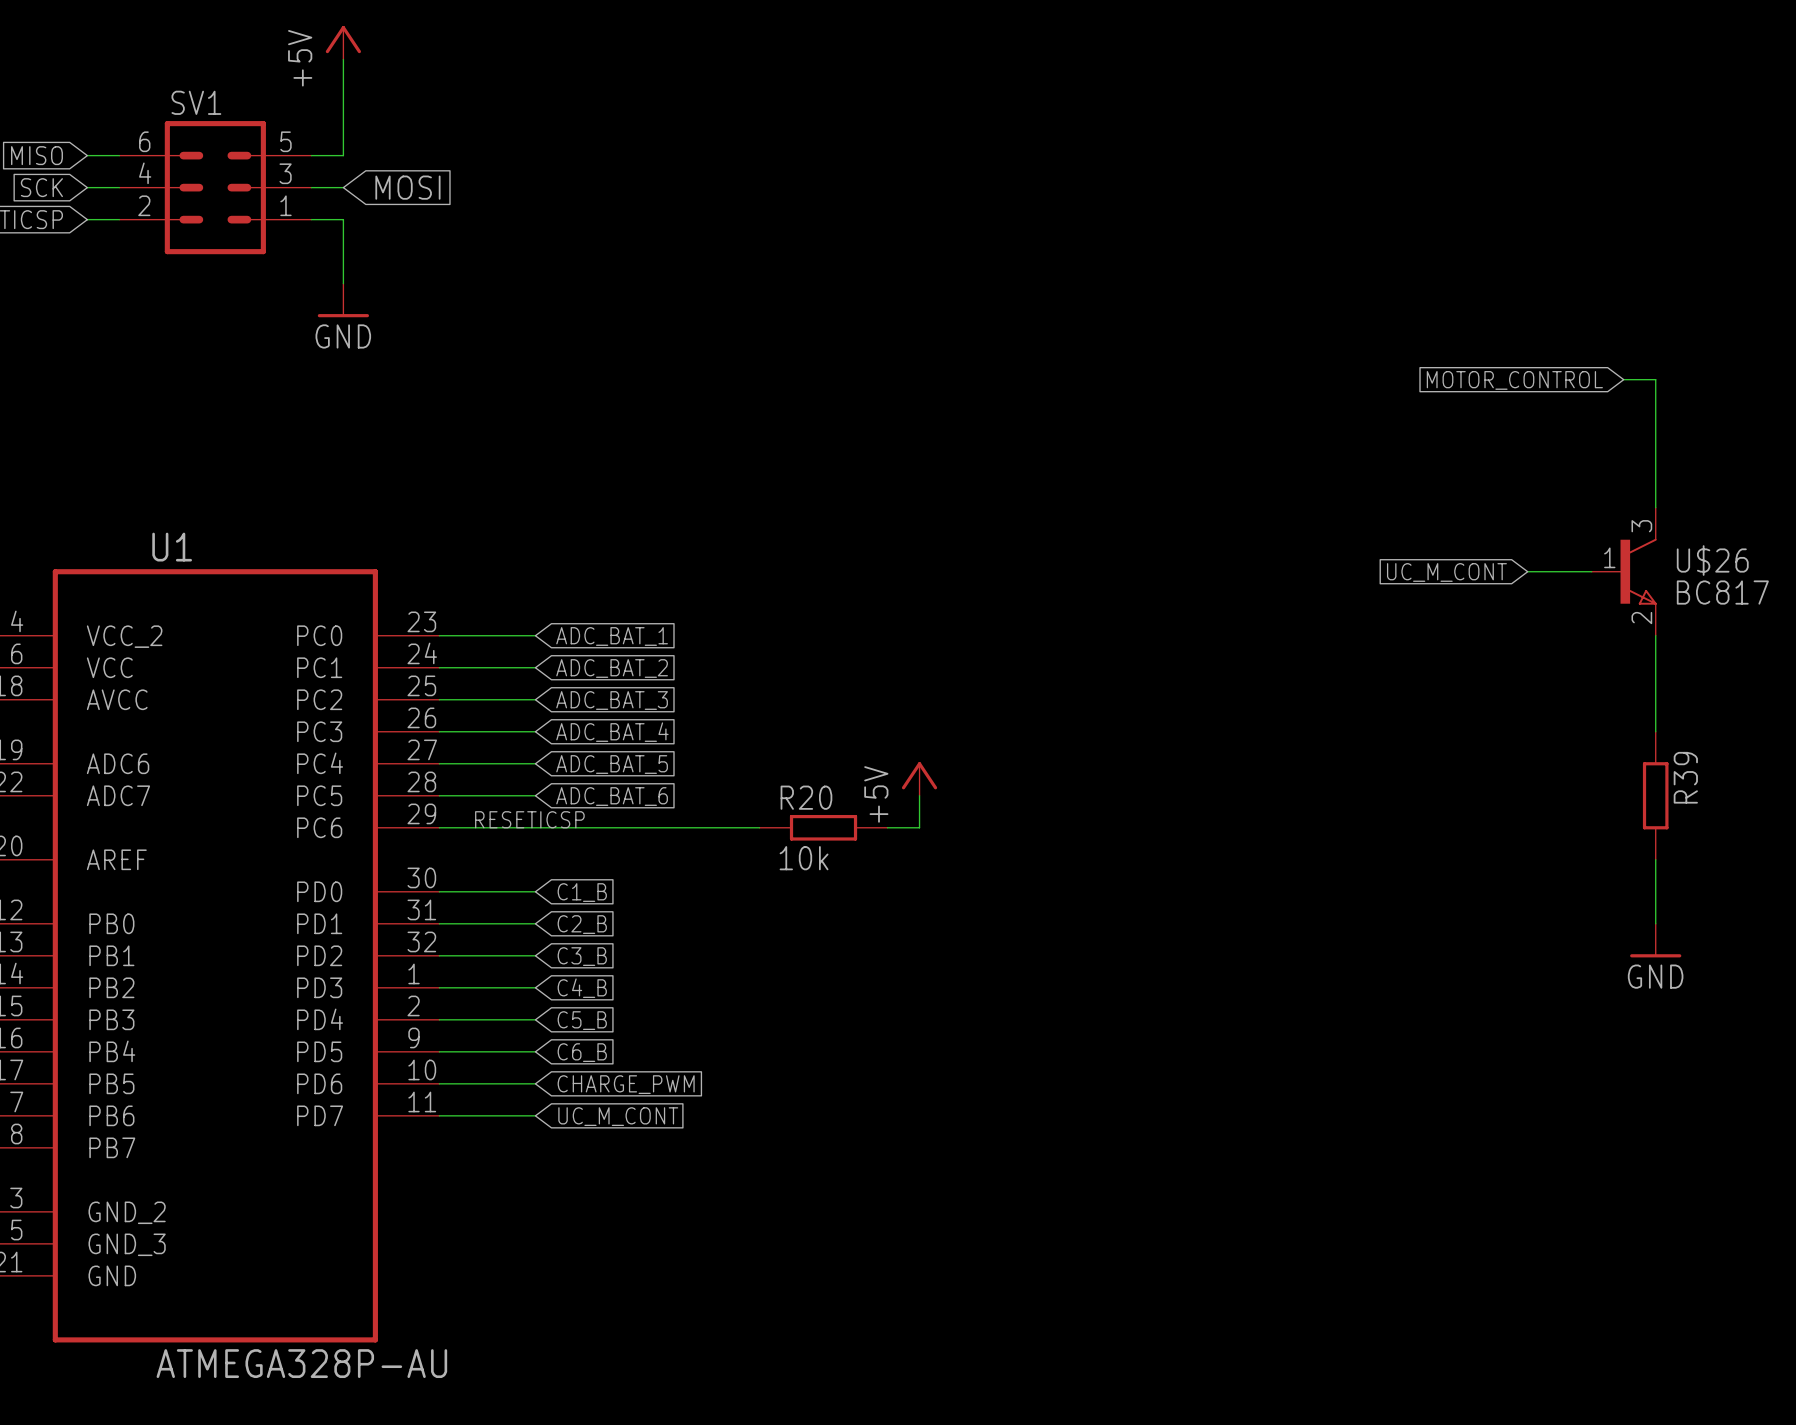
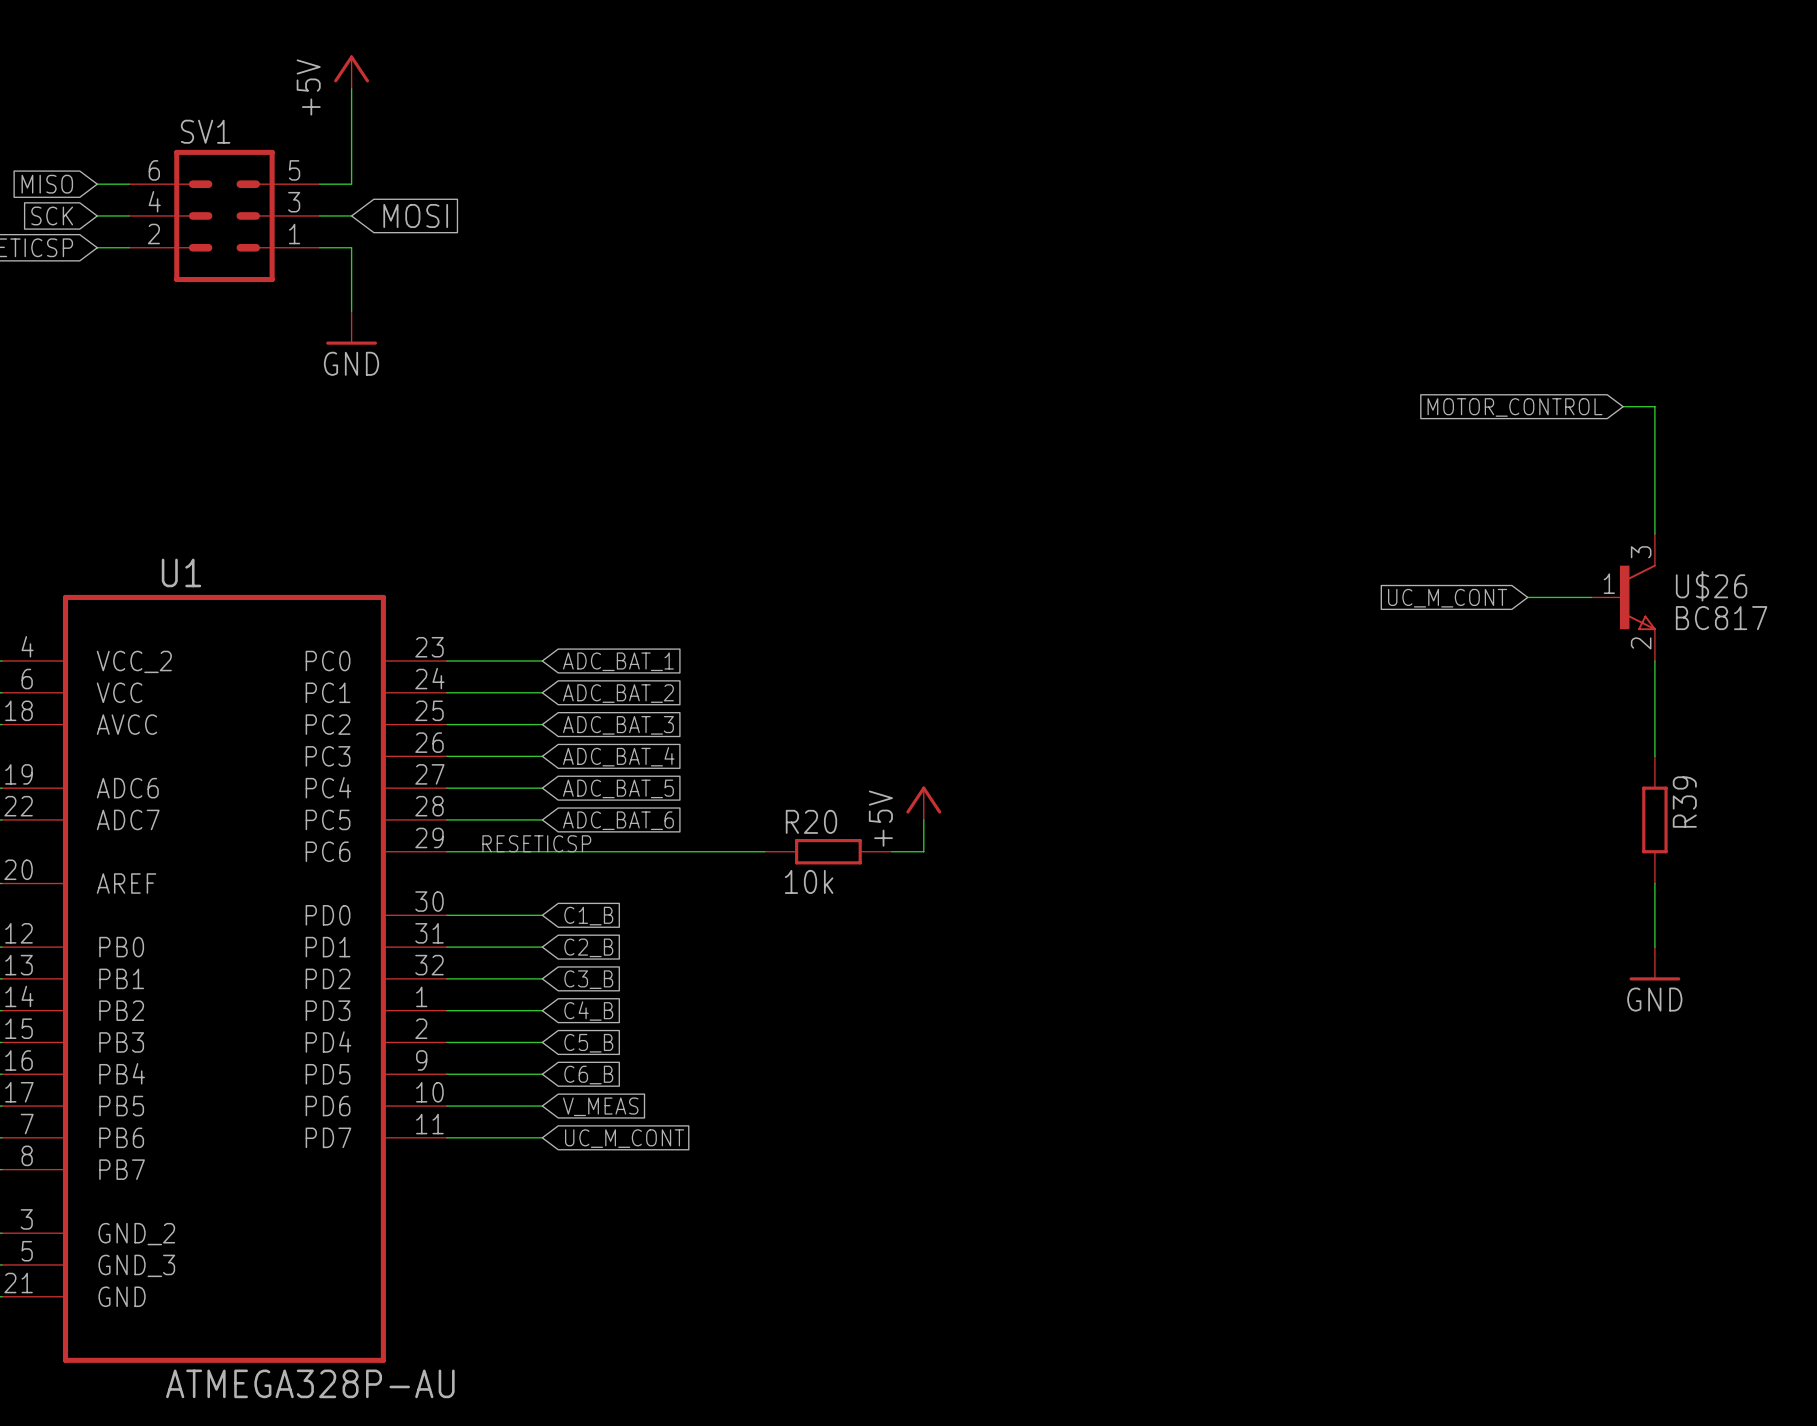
global label: CHARGE_PWM (626, 1084) -> V_MEAS (600, 1106)

